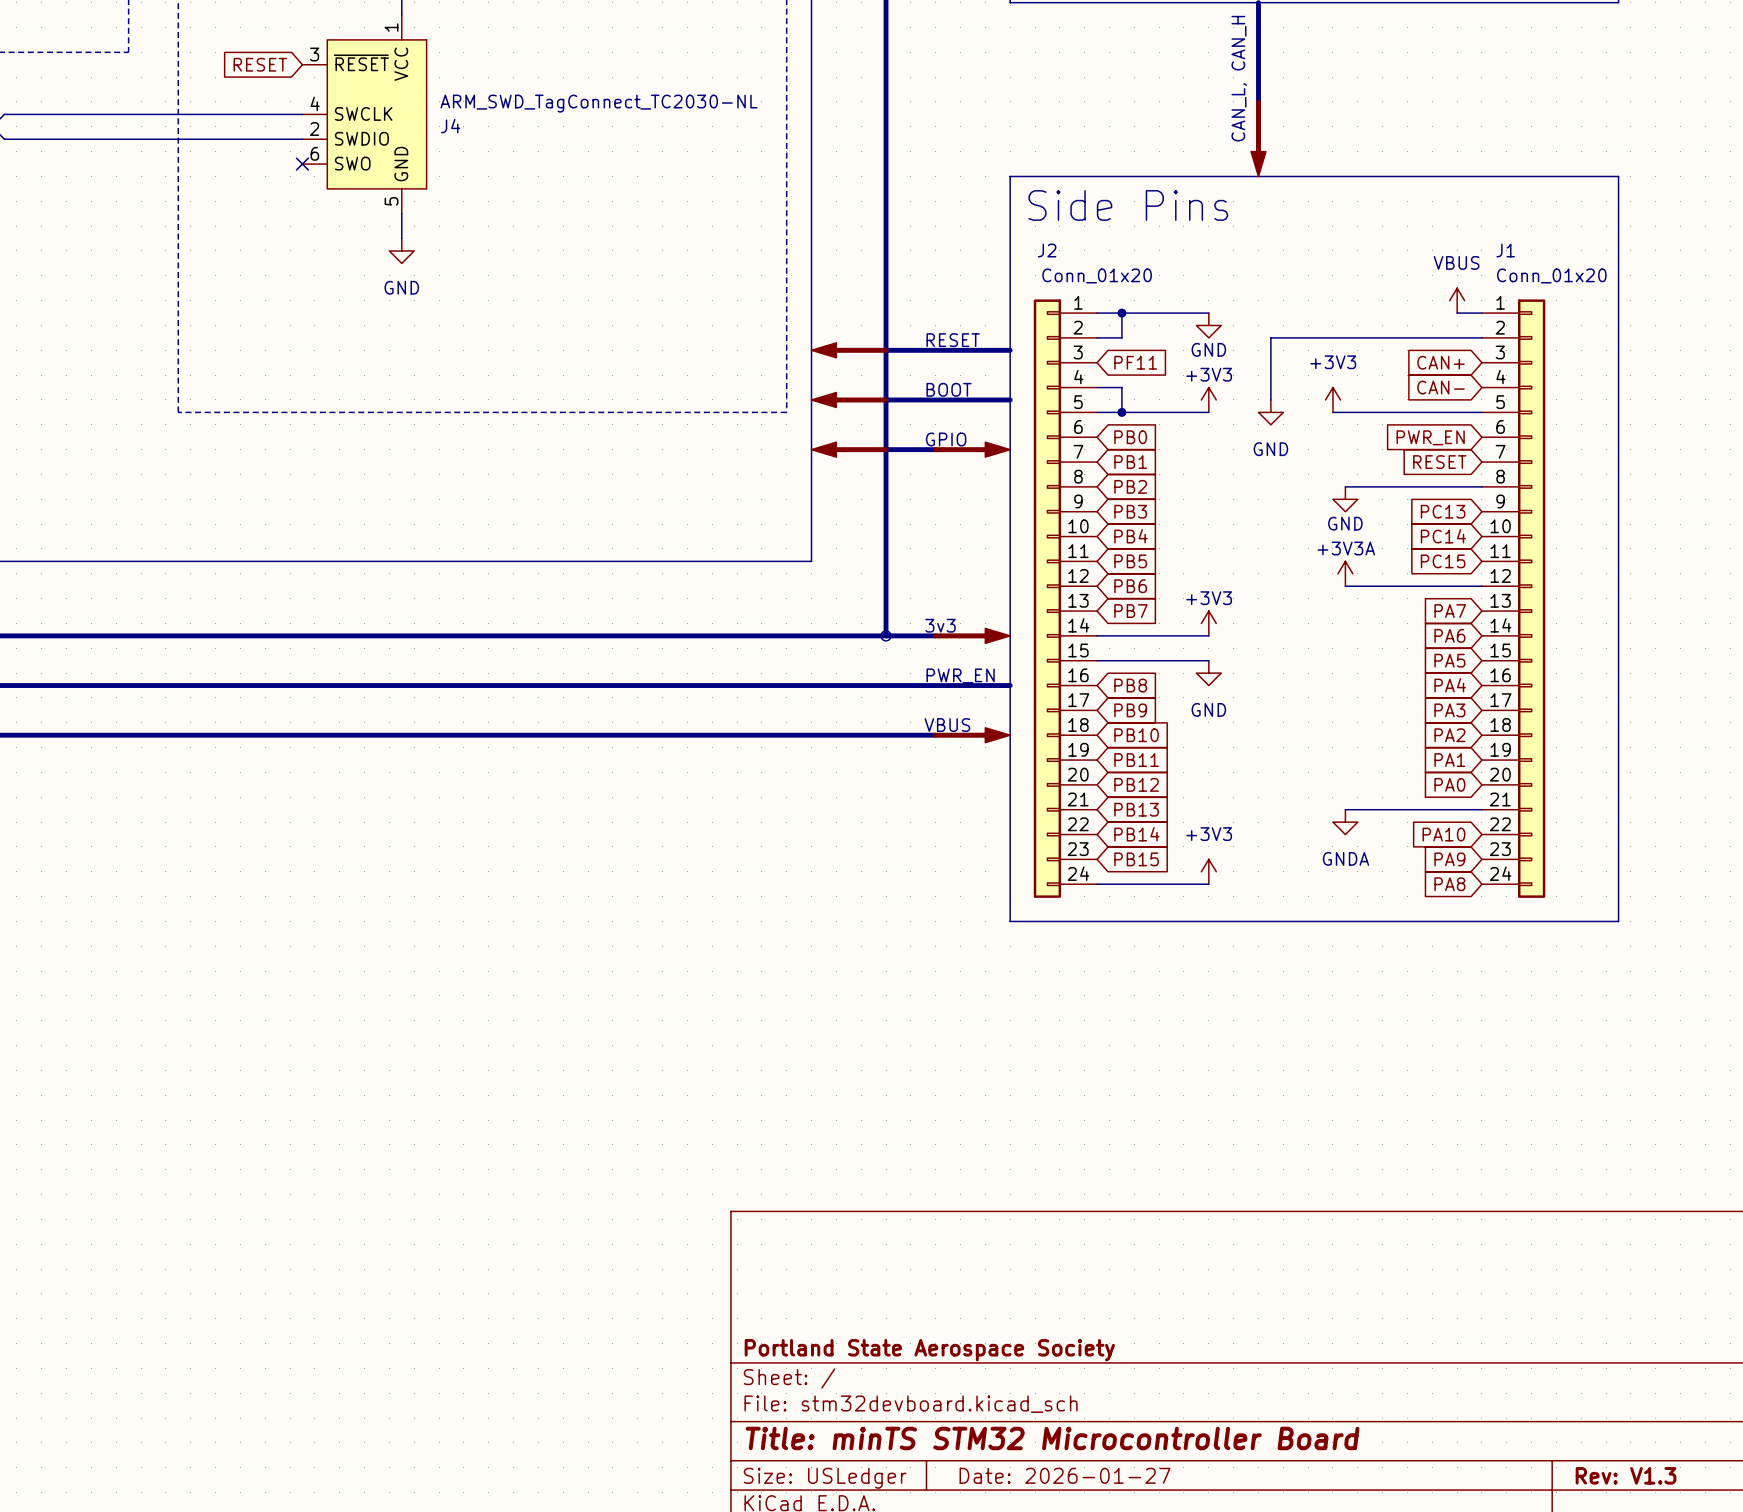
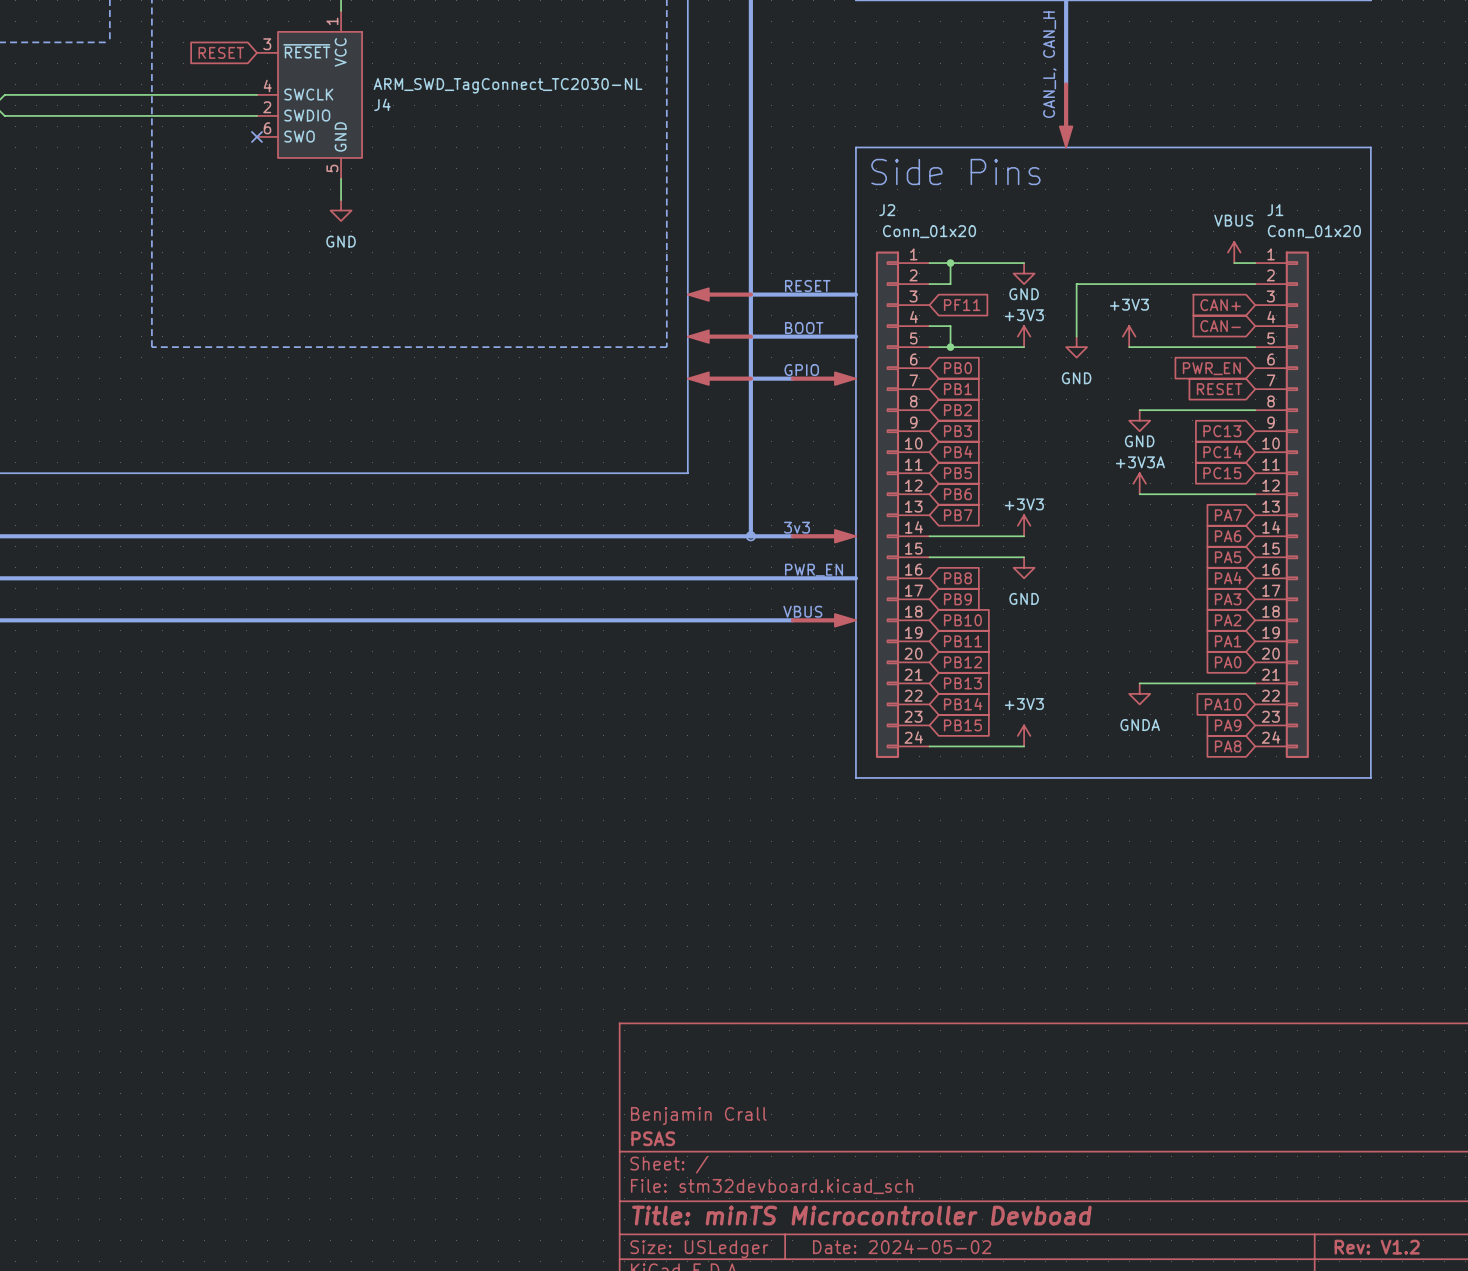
title block: none -> Benjamin Crall (698, 1116)
title block: Portland State Aerospace Society (929, 1350) -> PSAS (653, 1138)
title block: Title: minTS STM32 Microcontroller Board (1052, 1438) -> Title: minTS Microcontroller Devboad (861, 1215)
title block: Date: 2026-01-27 (1065, 1475) -> Date: 2024-05-02 (902, 1246)
title block: Rev: V1.3 (1626, 1475) -> Rev: V1.2 (1377, 1247)

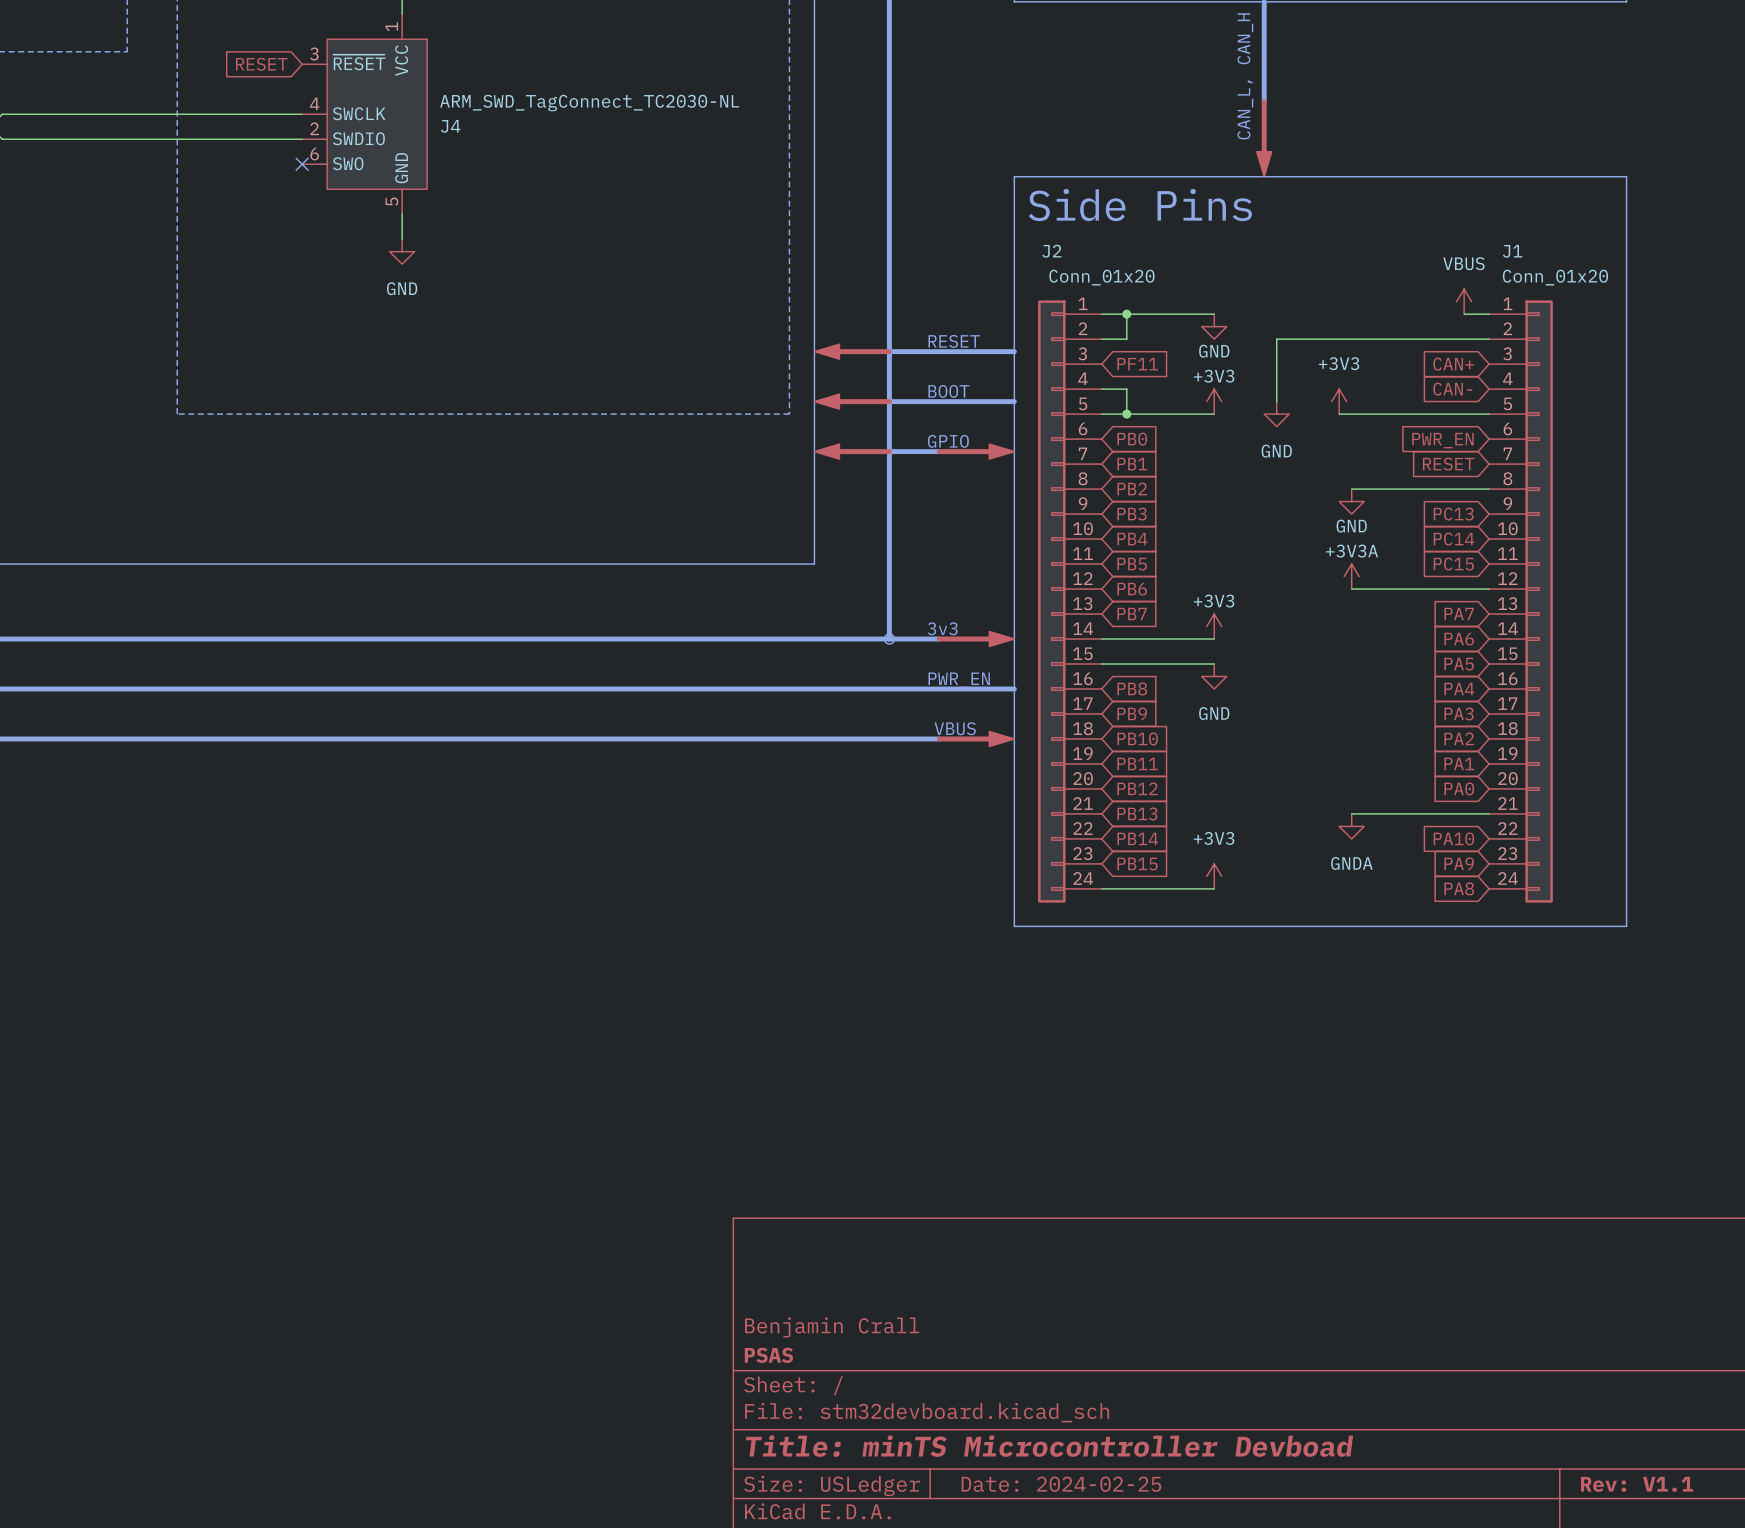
title block: Date: 2024-05-02 (902, 1246) -> Date: 2024-02-25 (1061, 1484)
title block: Rev: V1.2 (1377, 1247) -> Rev: V1.1 (1637, 1484)

